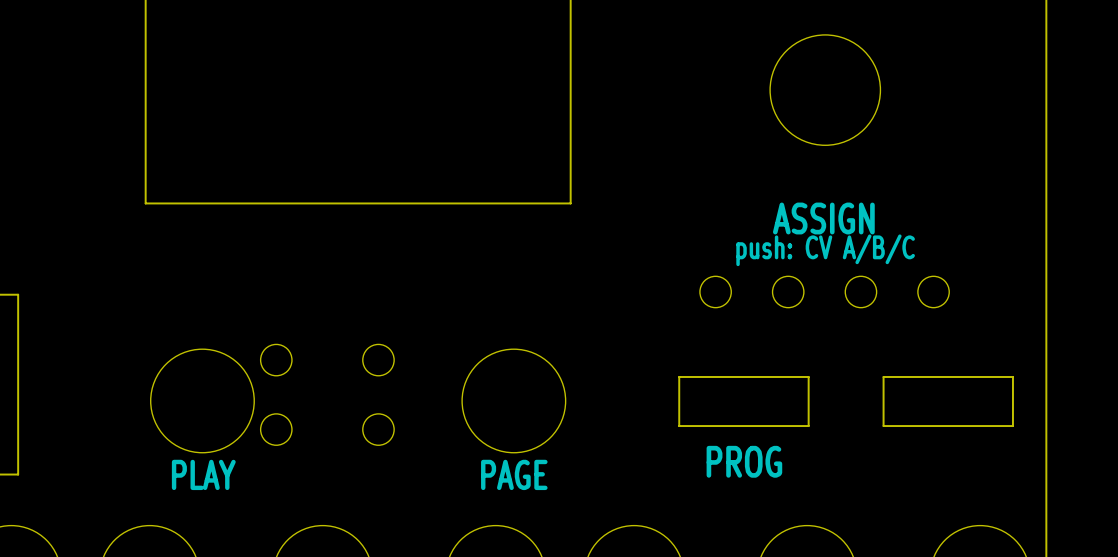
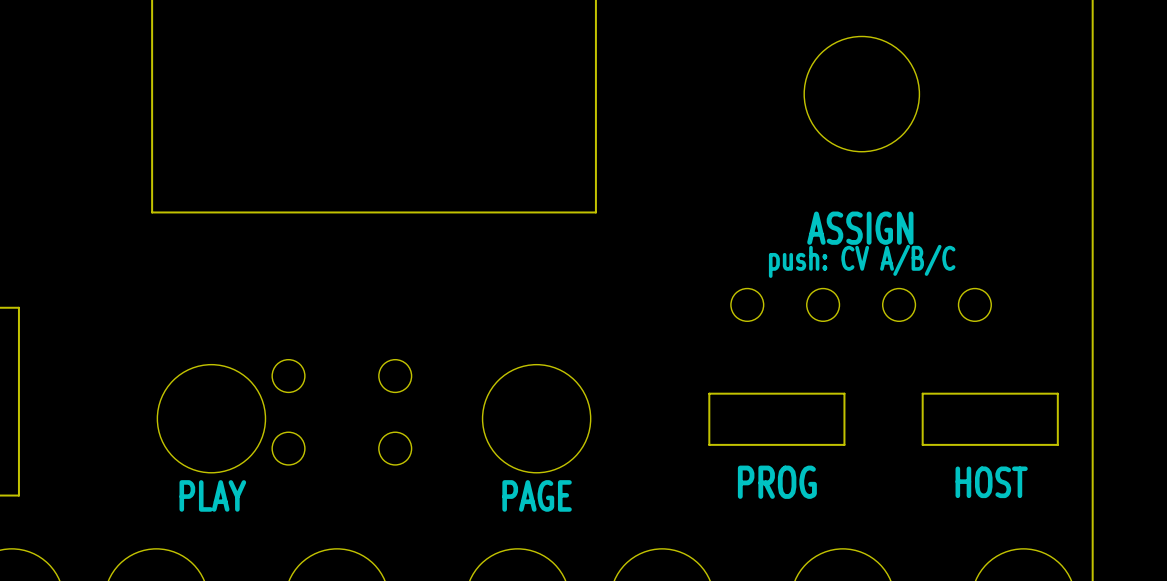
text: none -> HOST (991, 482)

